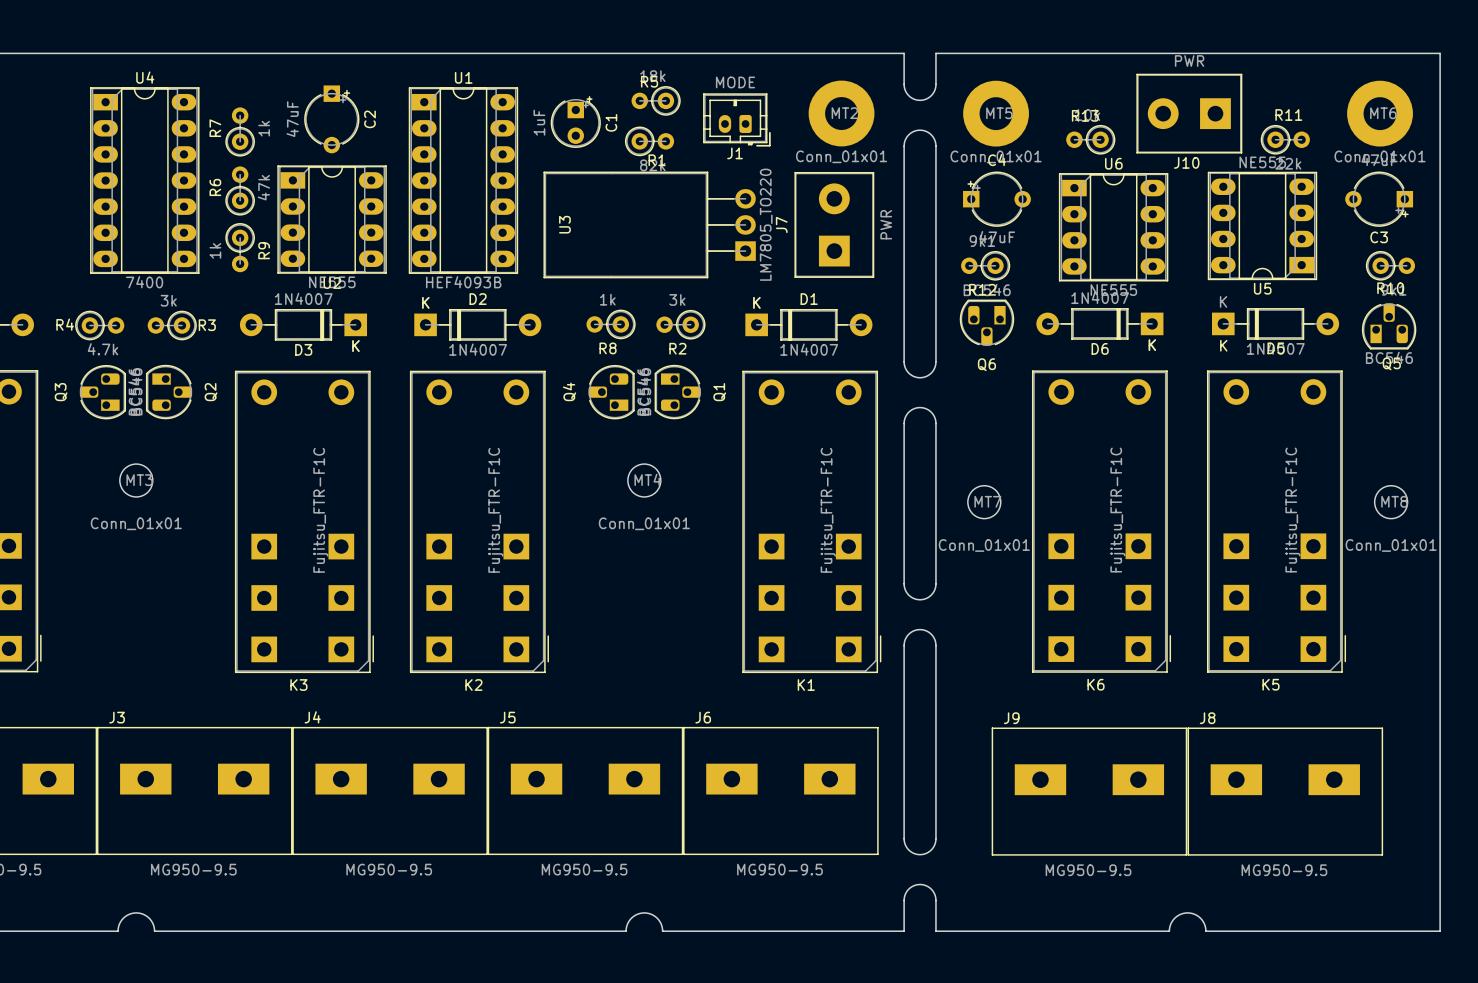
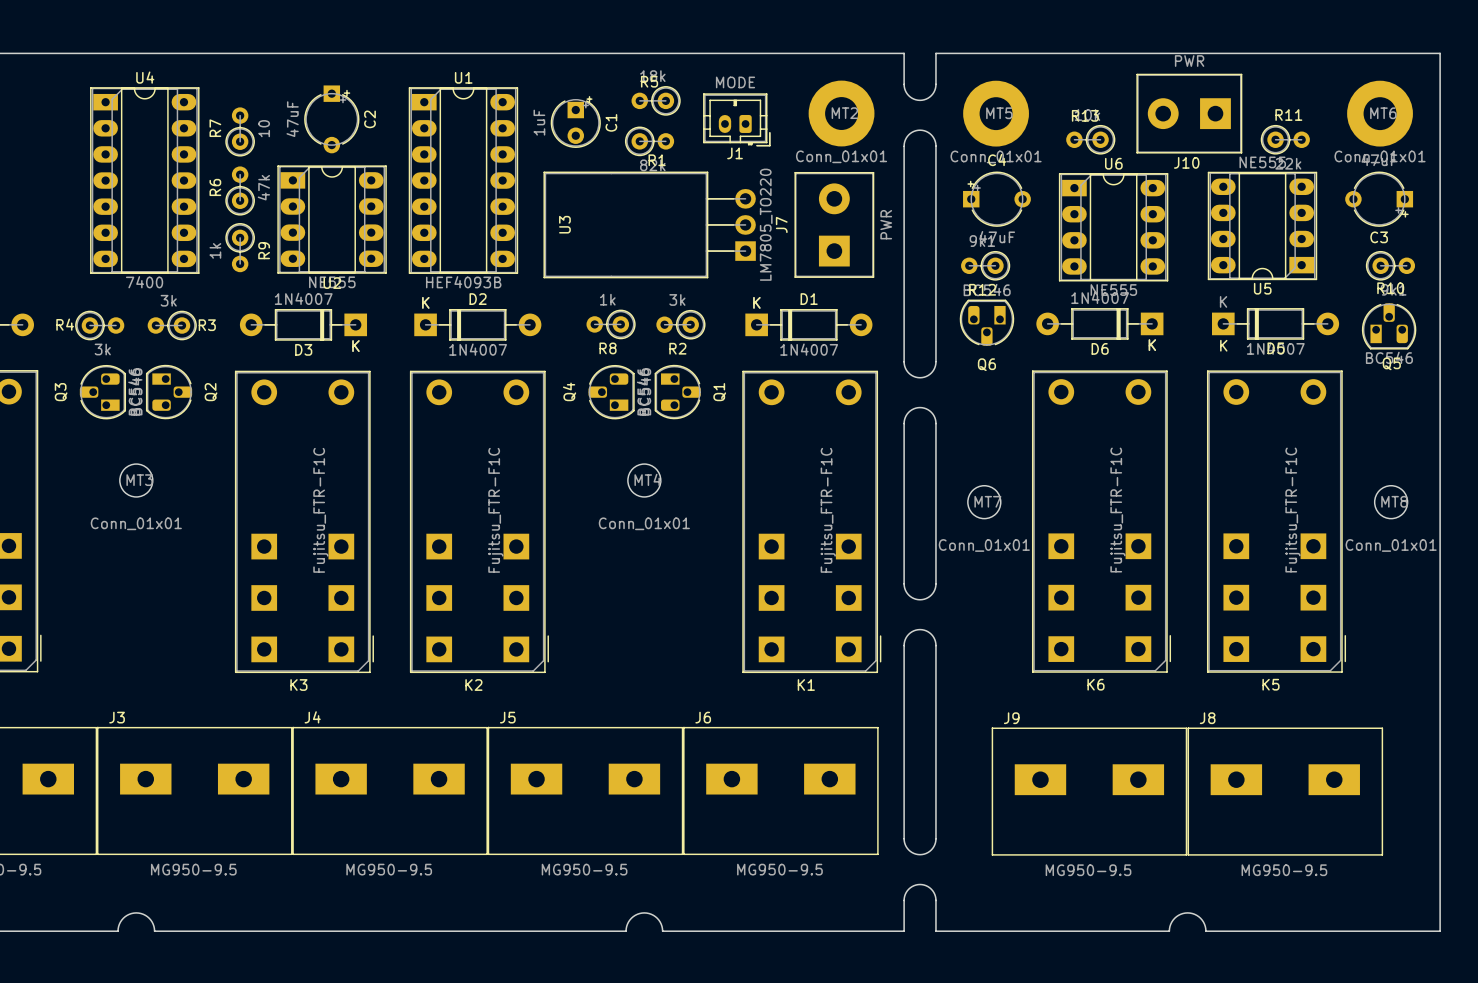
R7 value: 1k (264, 128) -> 10 (264, 128)
R4 value: 4.7k (103, 349) -> 3k (102, 349)

